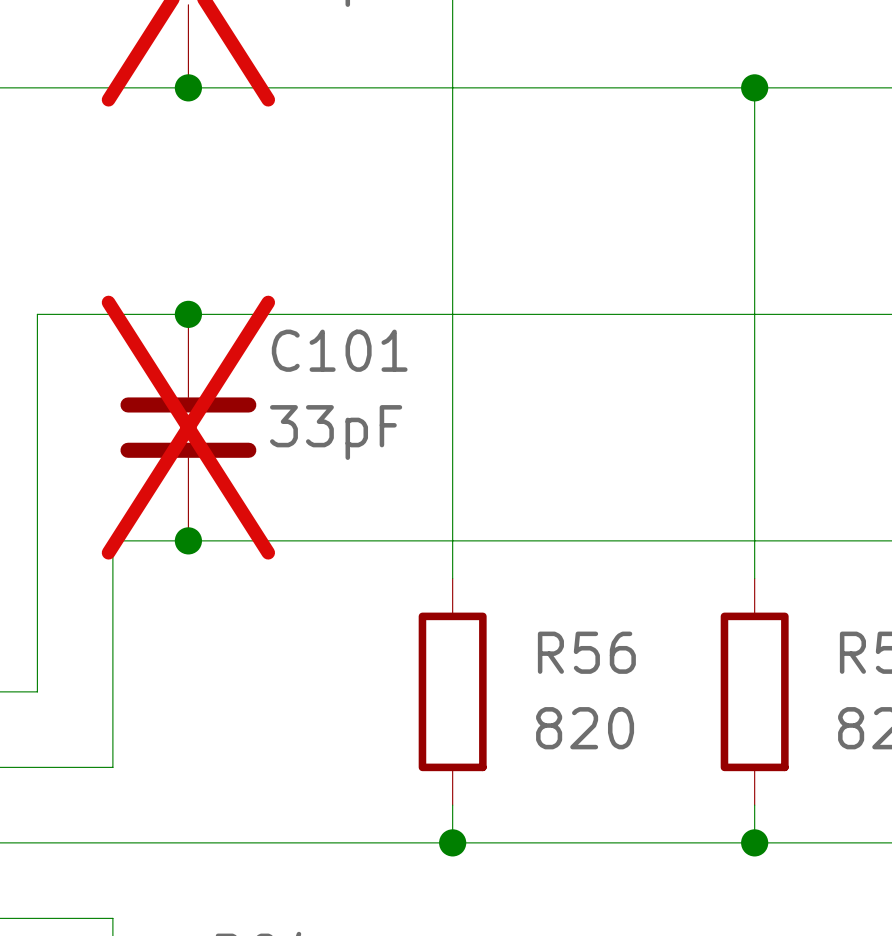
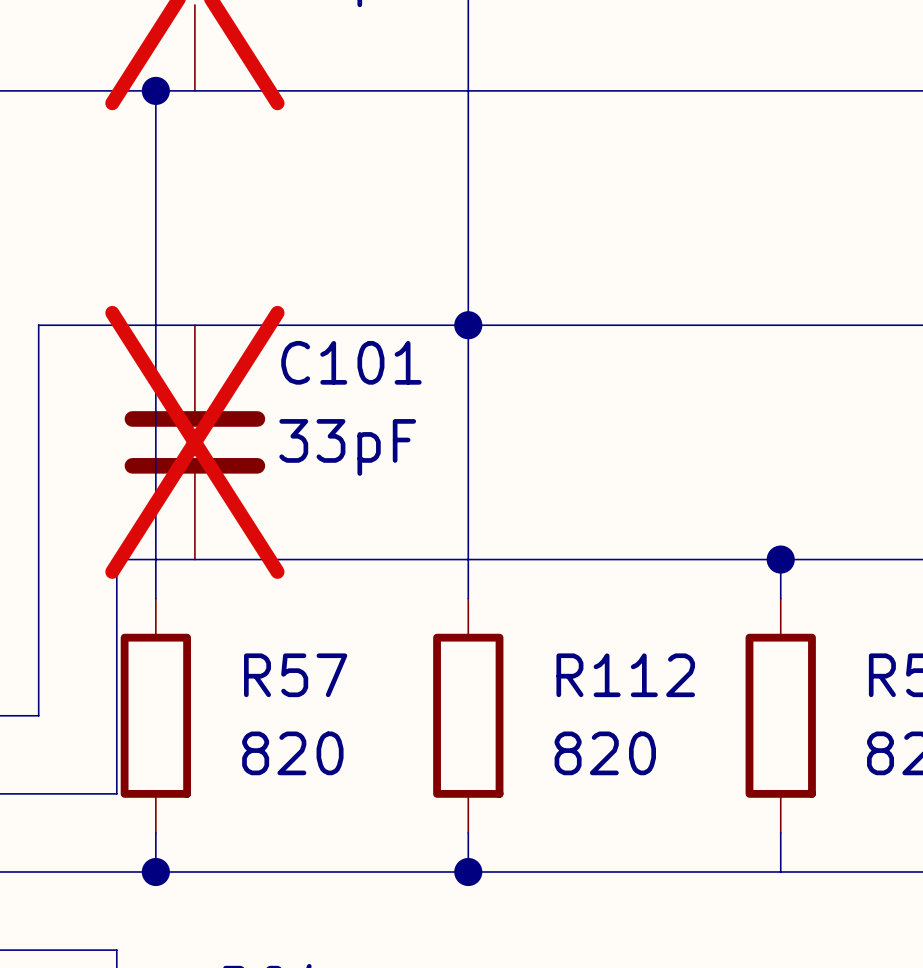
wire: none -> (155, 90) (155, 598)
junction position: (188, 87) -> (155, 90)
wire: (754, 87) (754, 540) -> none
junction: (754, 87) -> none
junction: (188, 314) -> none
junction: none -> (468, 325)
junction: (188, 540) -> none
junction: none -> (780, 559)
R56 name: R56 (586, 652) -> R112 (625, 675)
R57: none -> 820 (155, 715)
wire: none -> (155, 832) (155, 871)
junction: none -> (155, 871)
junction: (754, 842) -> none

